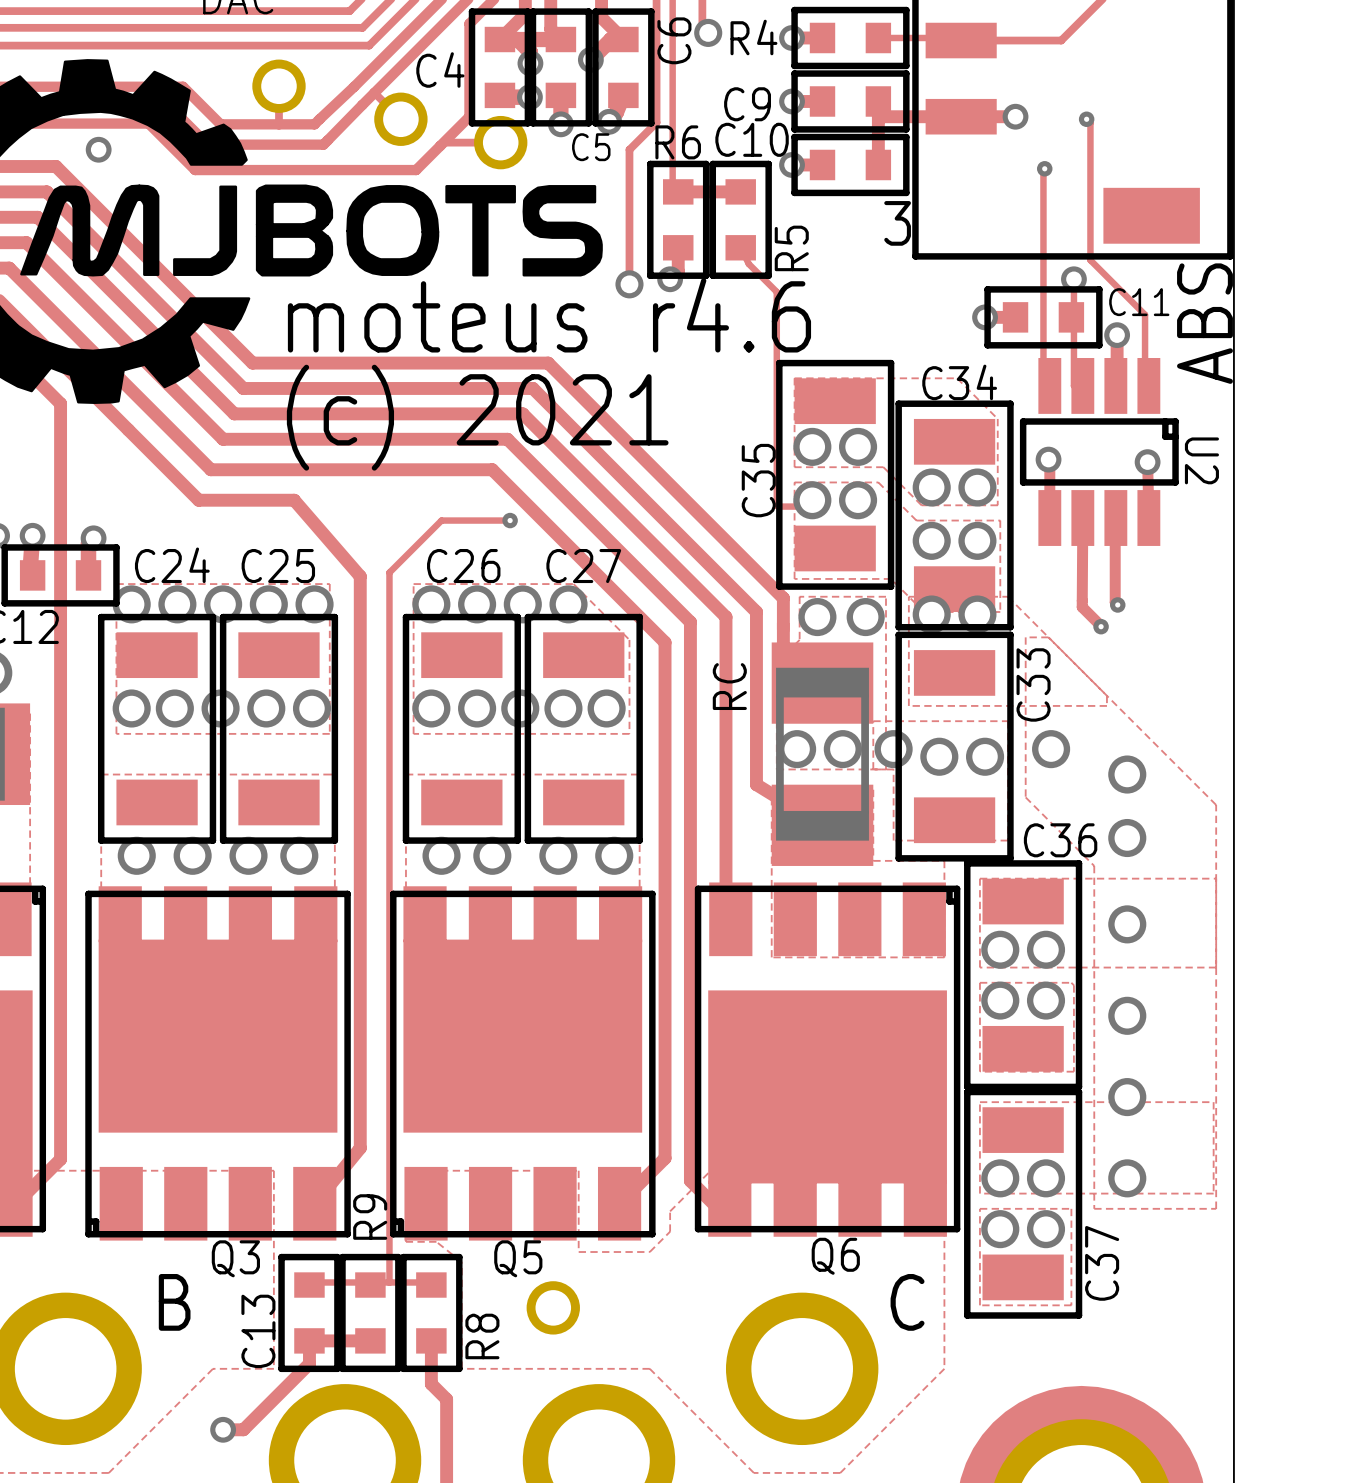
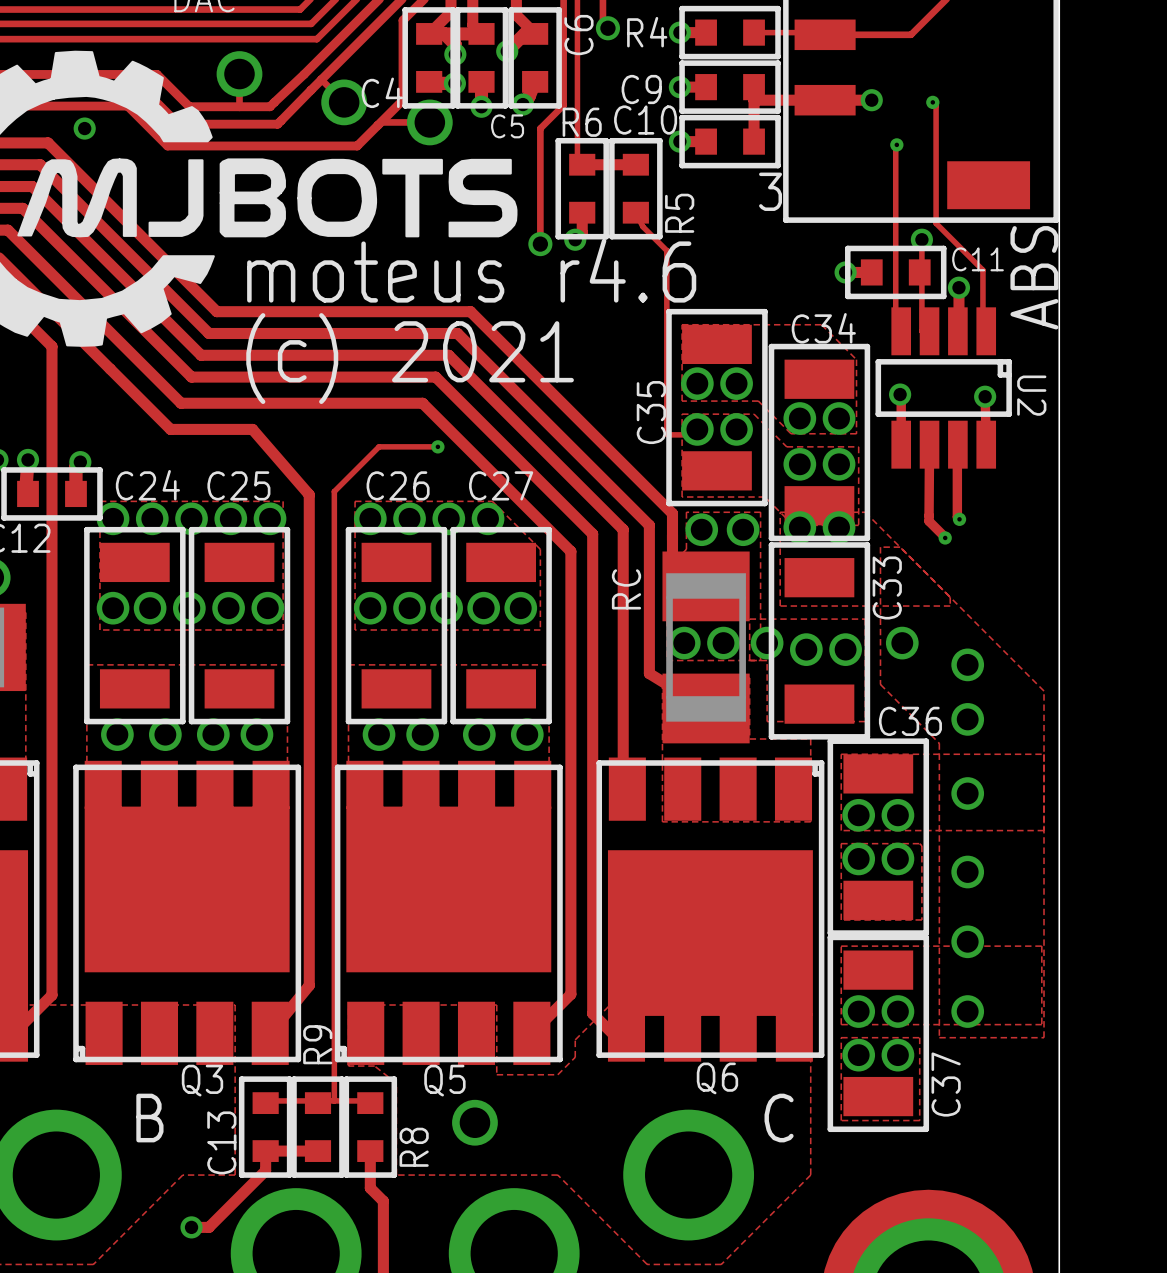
C4 name position: C4 (440, 70) -> C4 (382, 92)

